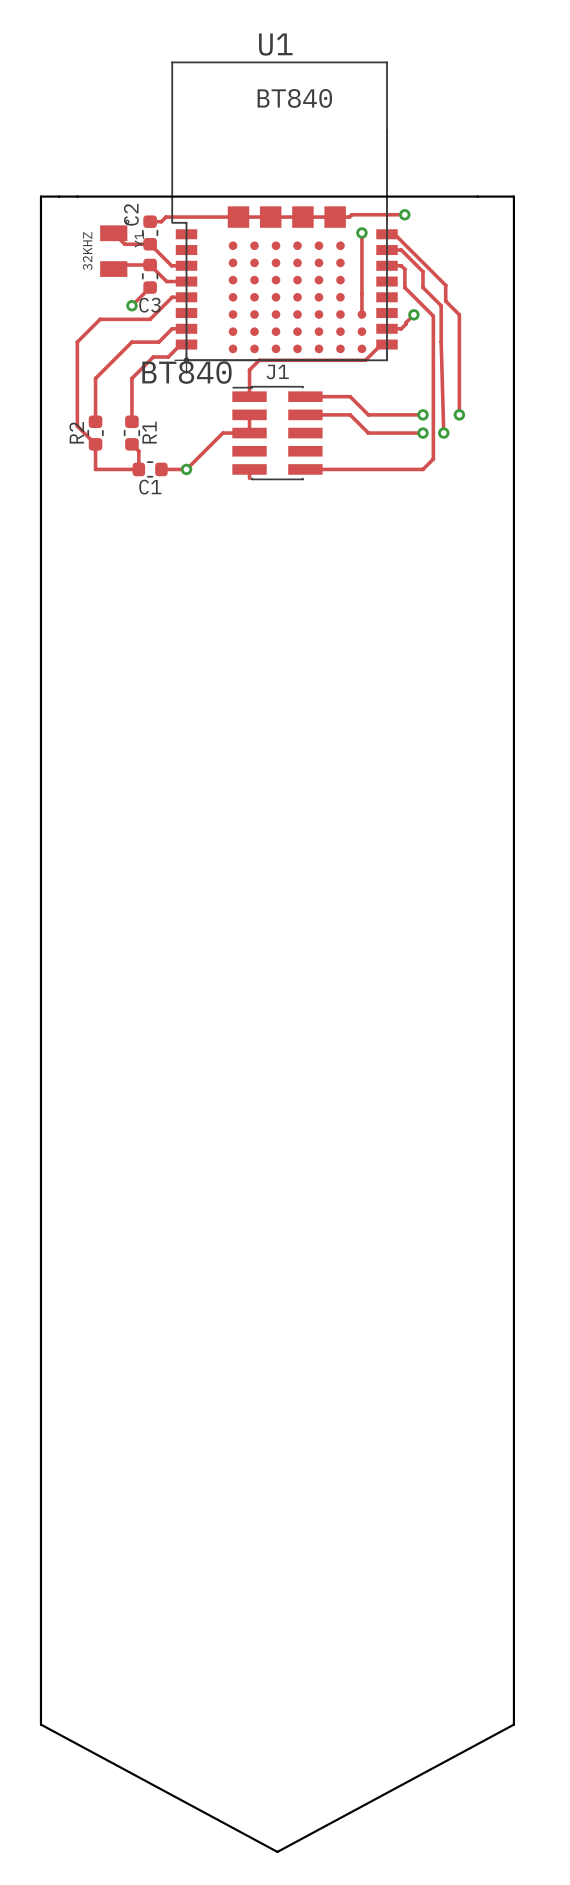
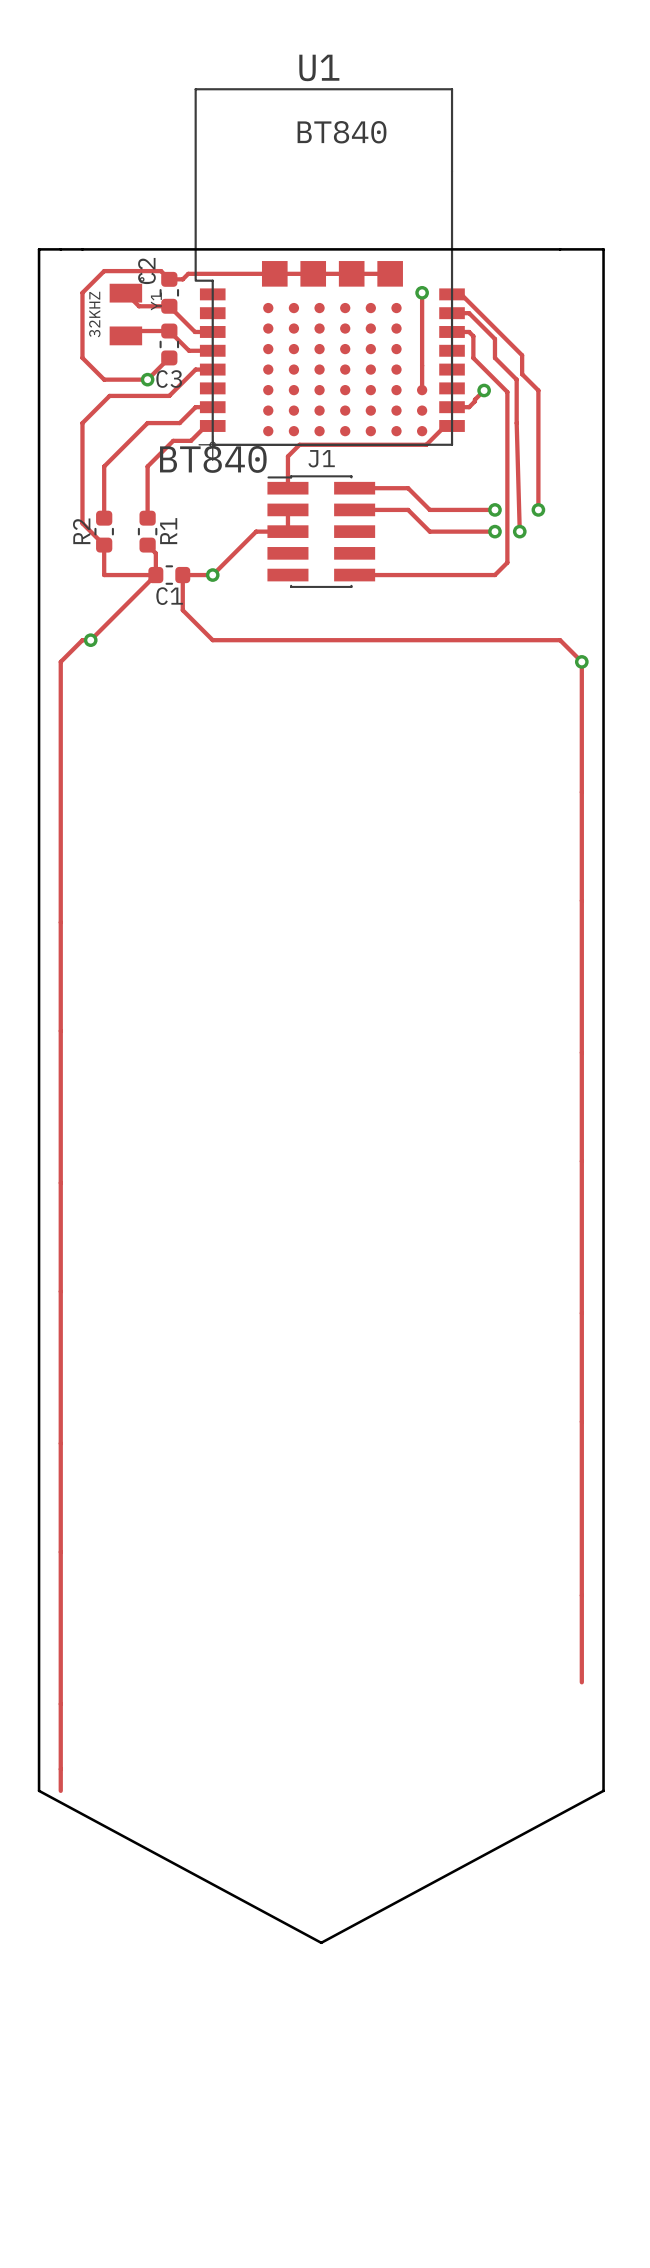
track: (404, 214) (351, 214) (349, 217) (335, 217) -> none
via: (404, 214) -> none
track: none -> (169, 279) (161, 271) (104, 271) (82, 292) (82, 357) (104, 379) (147, 379)
track: none -> (155, 575) (90, 640) (82, 640) (60, 661) (60, 1790)
track: none -> (182, 575) (182, 610) (212, 640) (560, 640) (581, 661) (581, 1682)
track: (249, 469) (249, 478) -> none
via: none -> (90, 640)
via: none -> (581, 661)
board edge: (40, 1488) (40, 1724) (277, 1851) (513, 1724) (513, 1488) -> (39, 1790) (321, 1942) (603, 1790)

